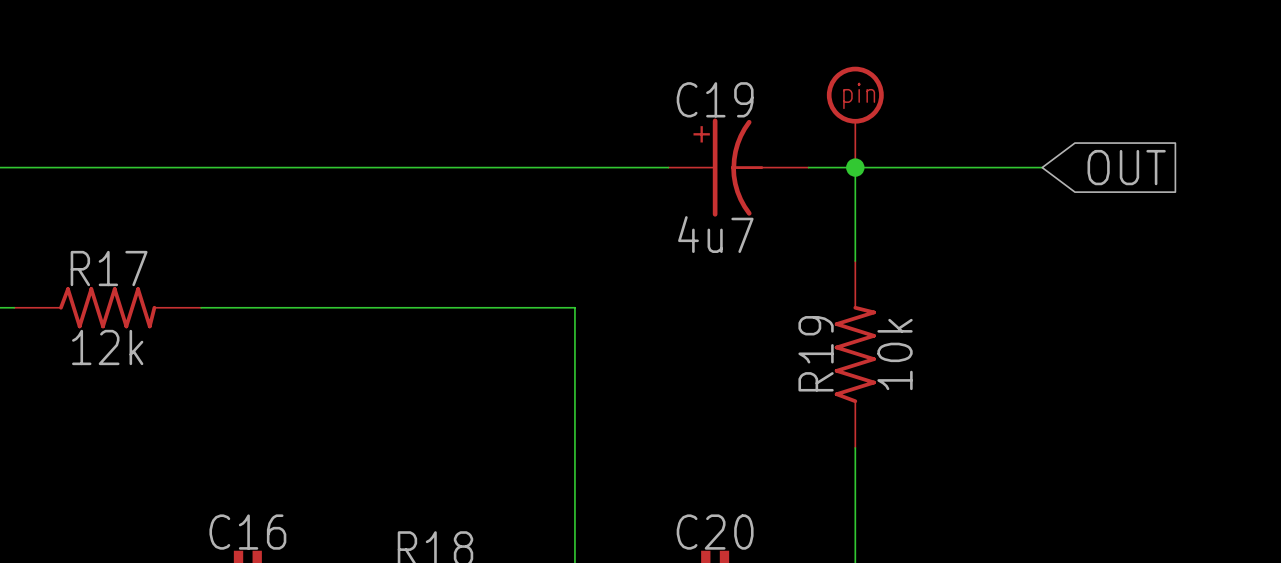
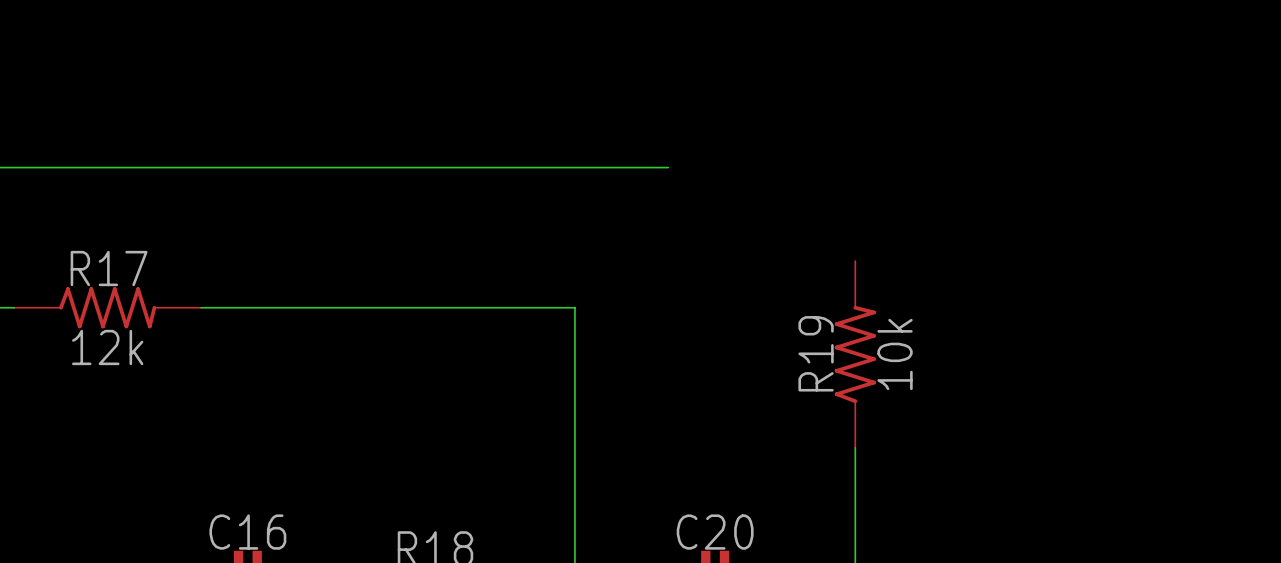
part: (855, 117) -> none
C19: 4u7 (738, 167) -> none
wire: (808, 167) (1042, 167) -> none
wire: (855, 167) (855, 261) -> none
junction: (855, 167) -> none
global label: OUT (1126, 167) -> none

